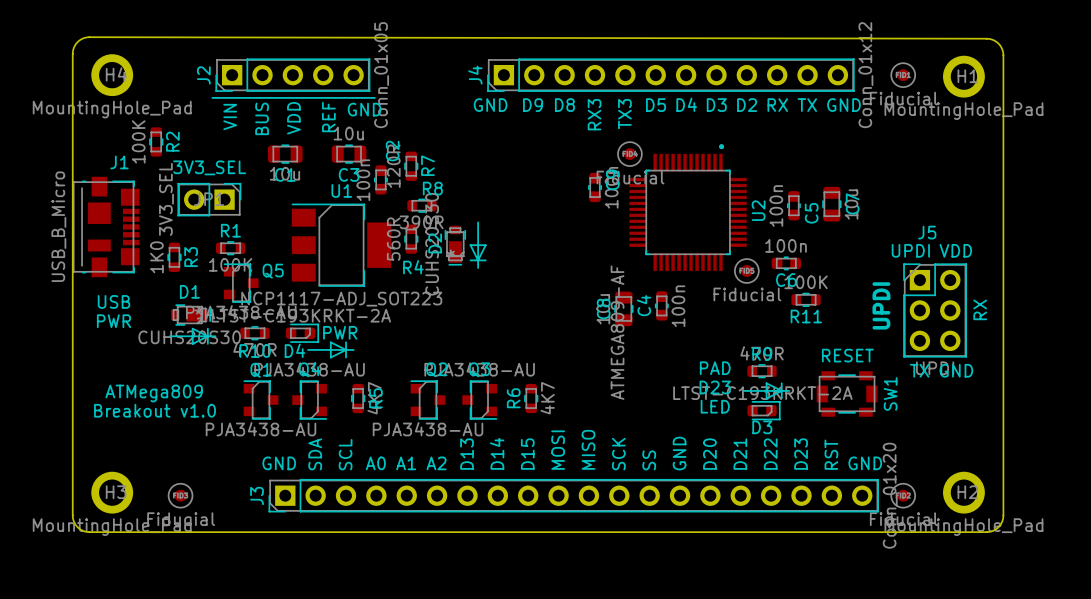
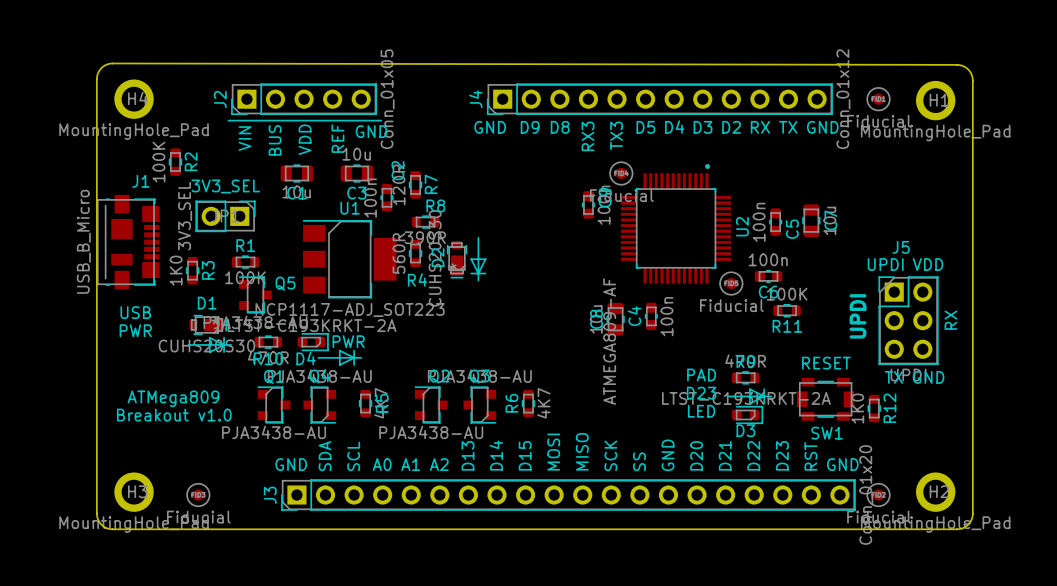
SW1 name rotation: 0° (890, 393) -> 90° clockwise (827, 433)
SW1 name position: SW1 (890, 393) -> SW1 (827, 433)
R12: none -> 1K0 (874, 408)

